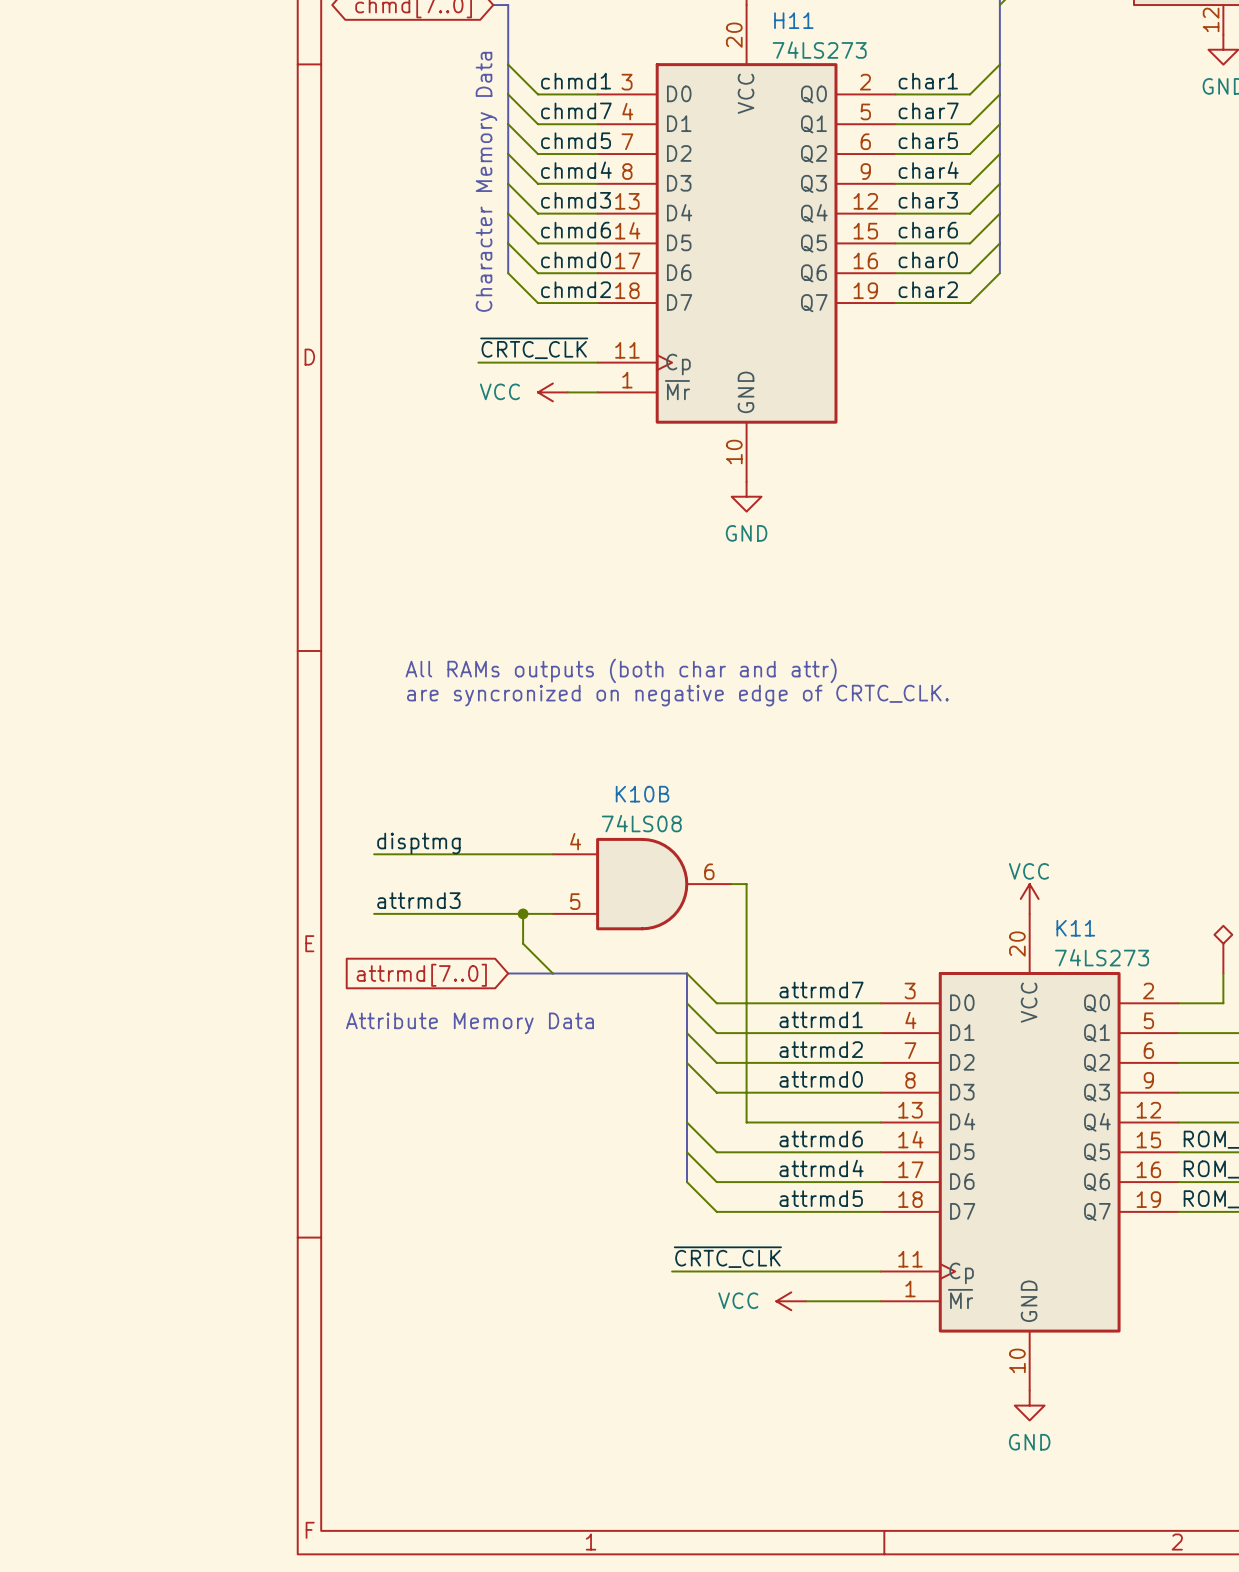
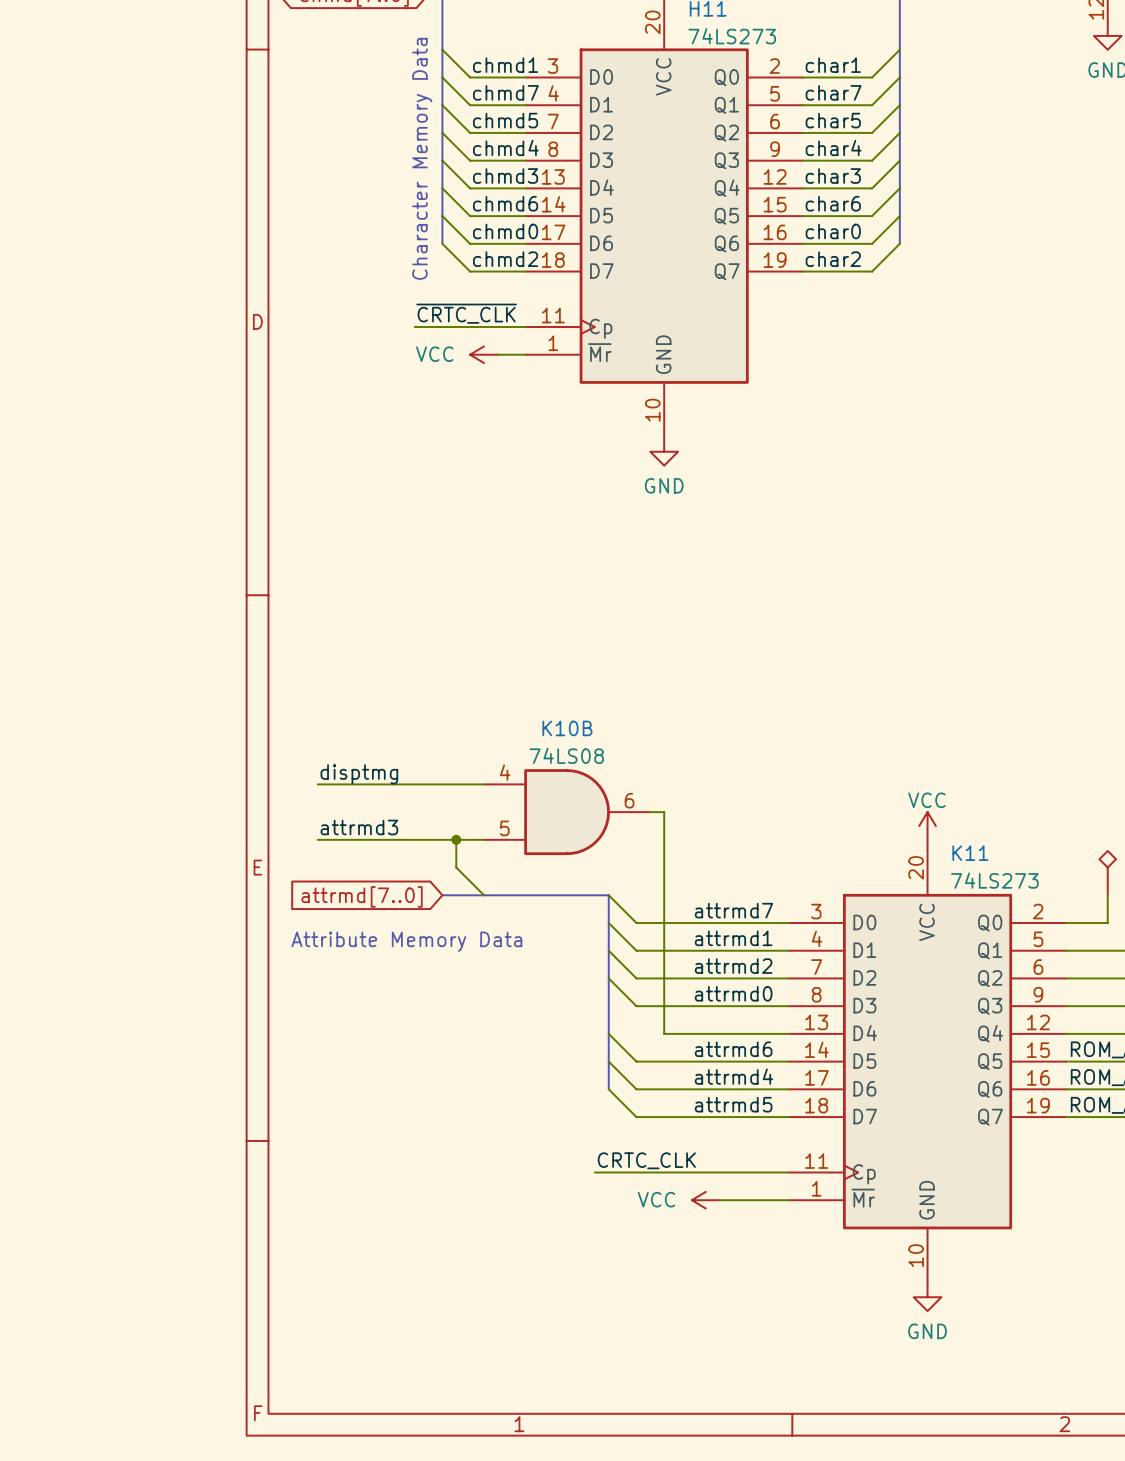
text: All RAMs outputs (both char and attr) (621, 670) -> none
text: are syncronized on negative edge of CRTC_CLK. (677, 695) -> none
label: ~{CRTC_CLK} (727, 1257) -> CRTC_CLK (646, 1160)

